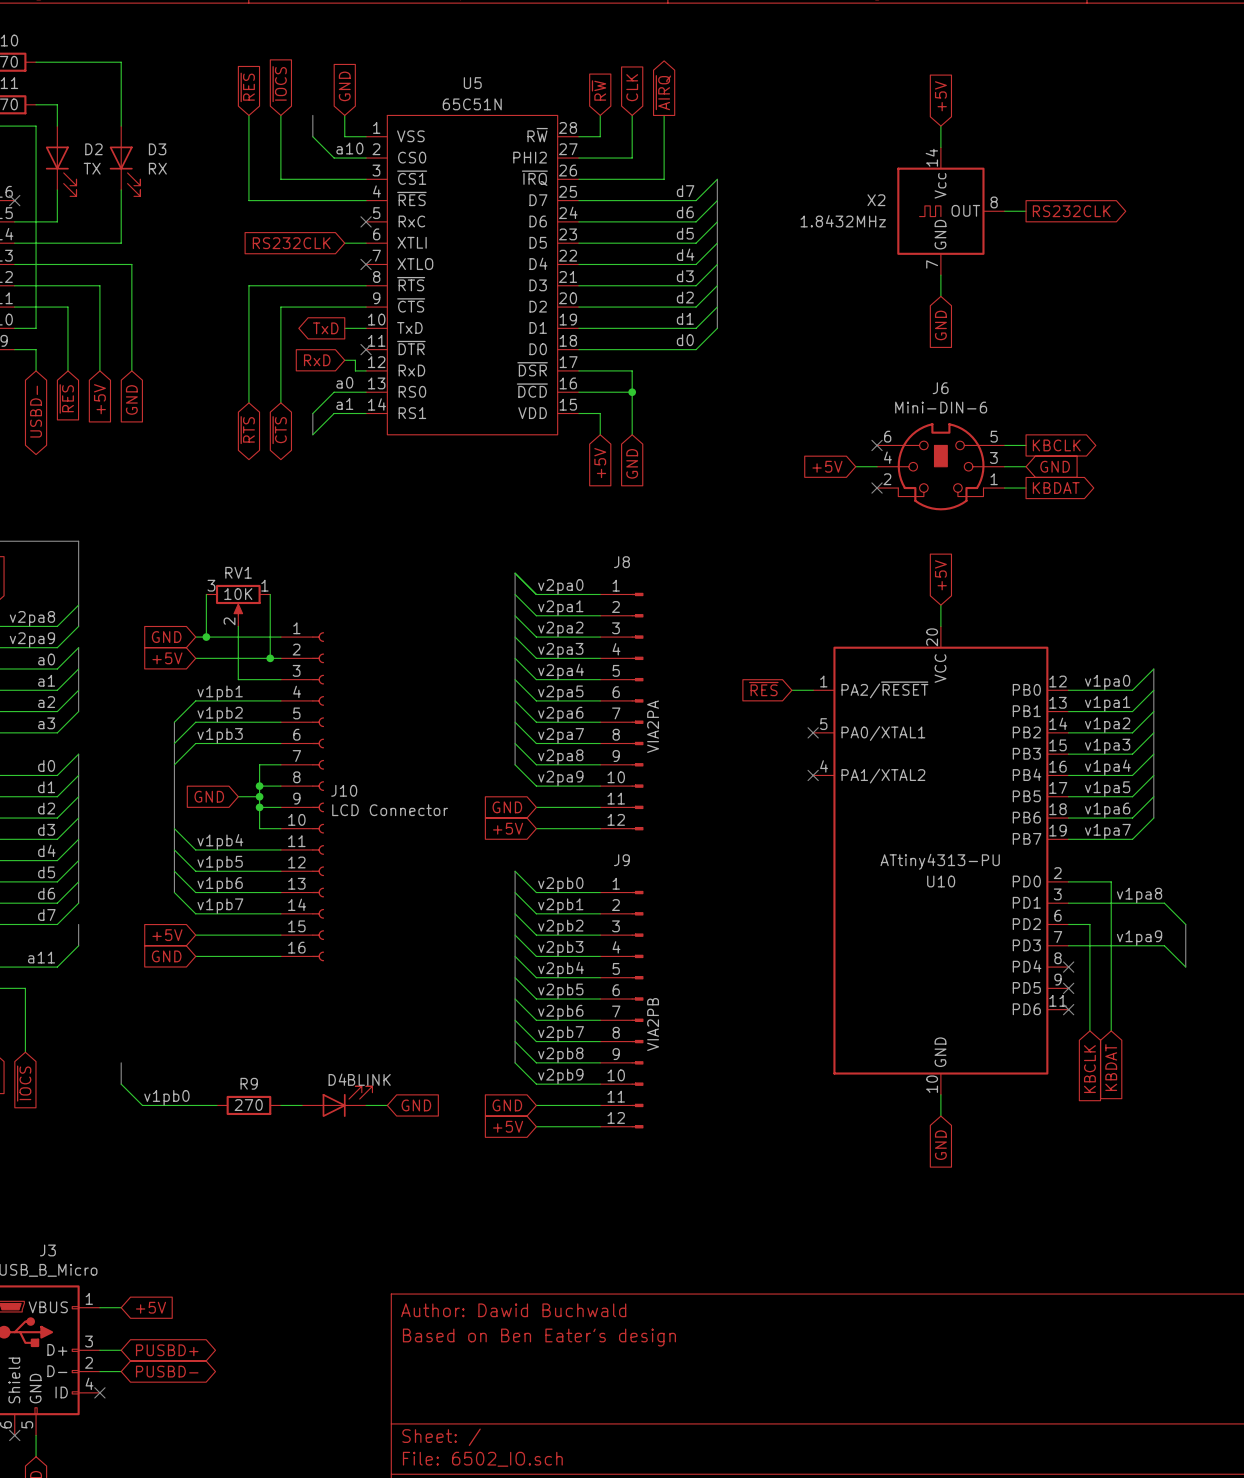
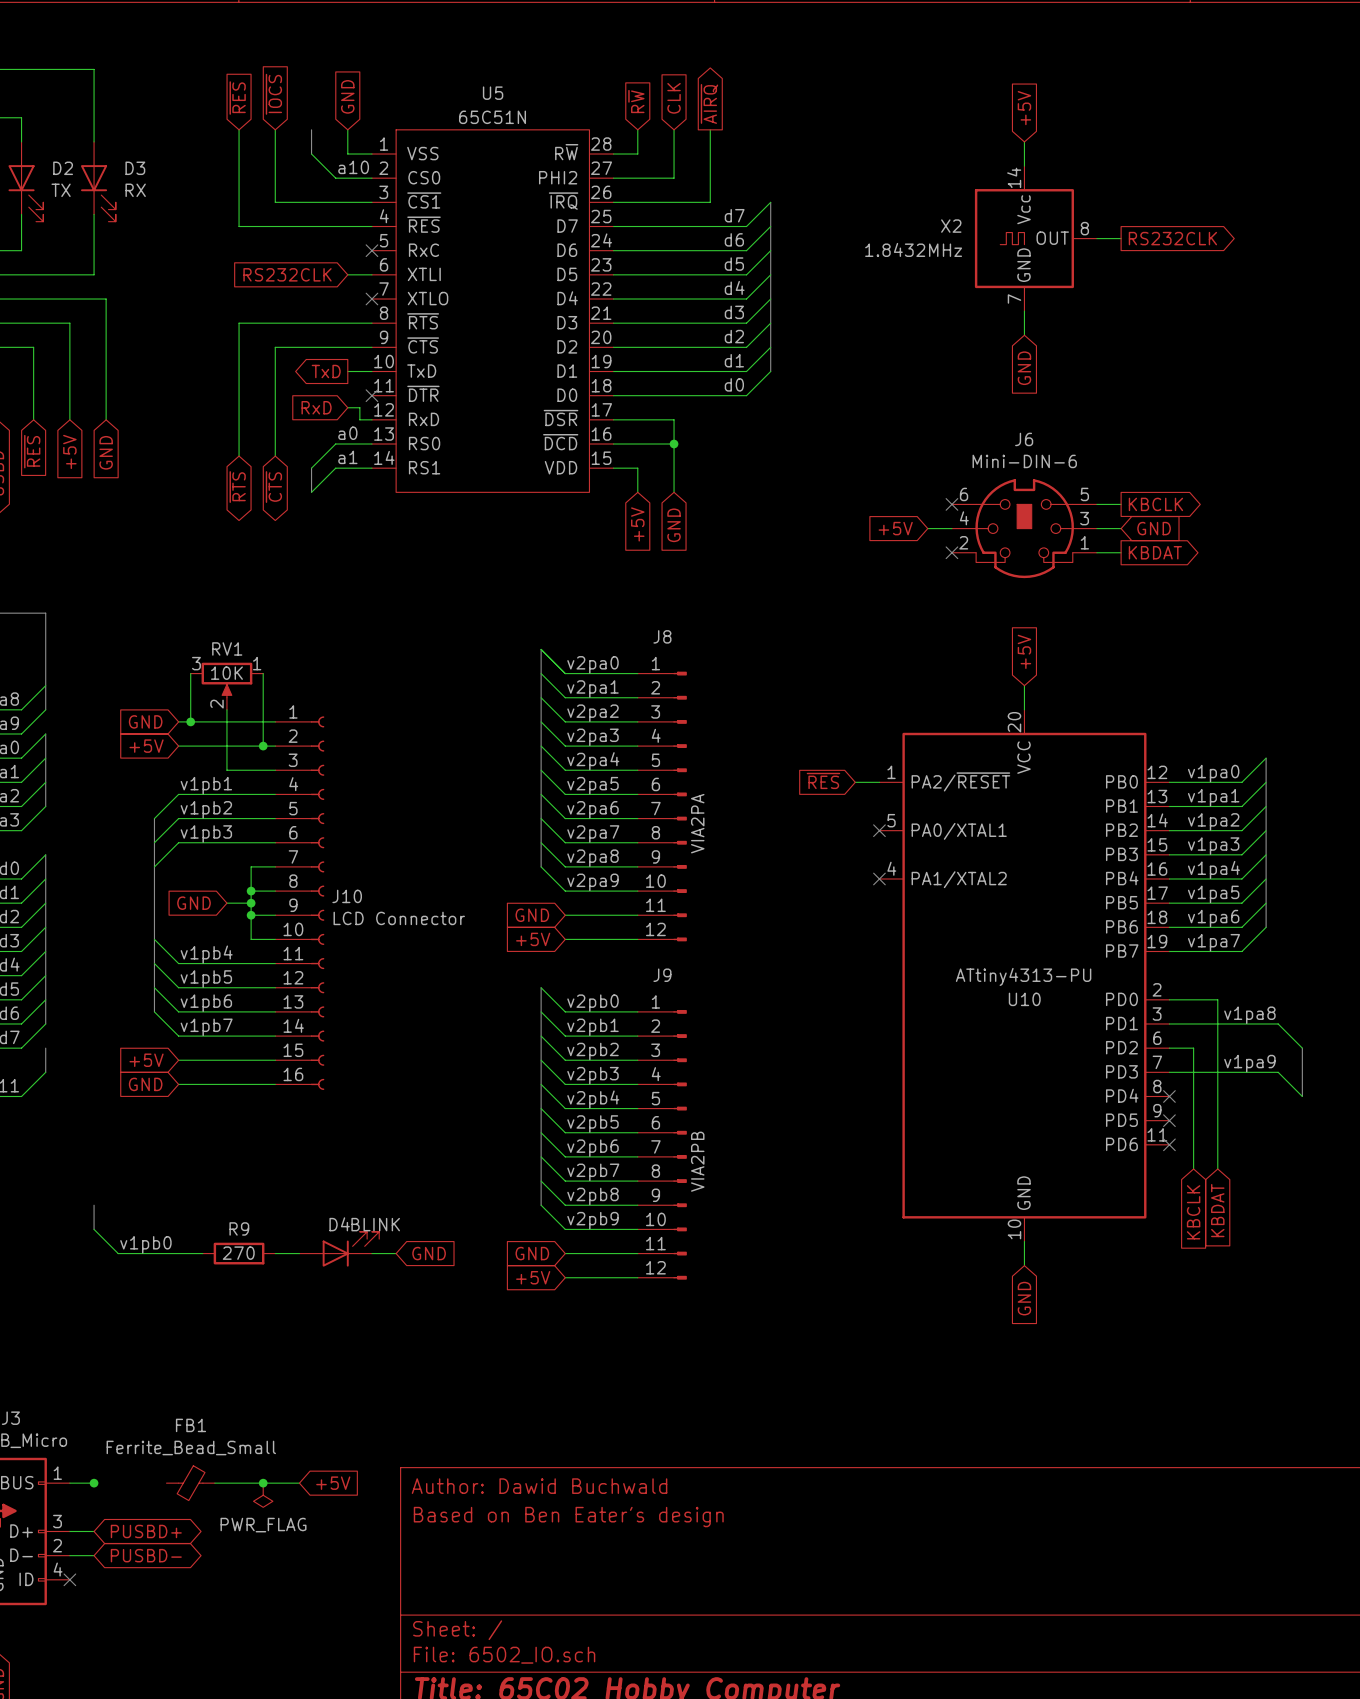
junction: none -> (94, 1483)
global label position: +5V (151, 1307) -> +5V (333, 1483)
FB1: none -> Ferrite_Bead_Small (190, 1483)
wire: none -> (214, 1483) (299, 1483)
junction: none -> (263, 1483)
power symbol: none -> PWR_FLAG (263, 1495)

